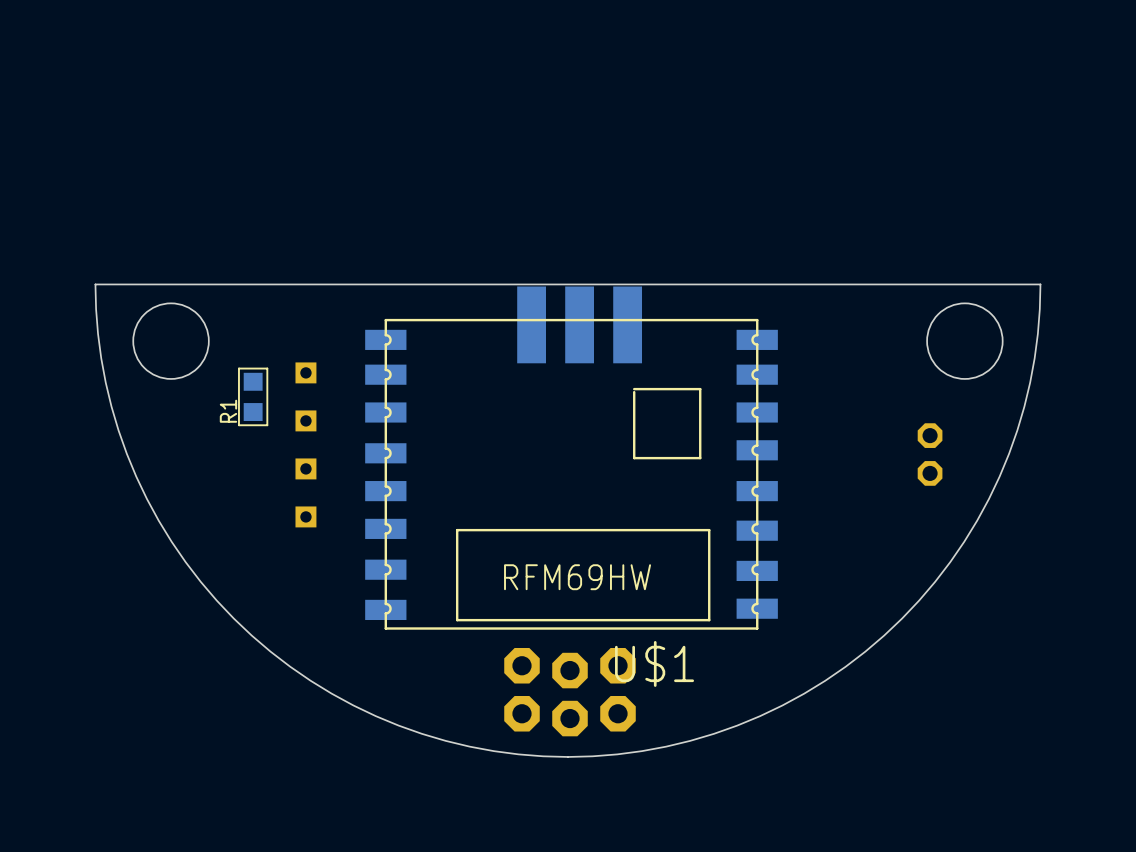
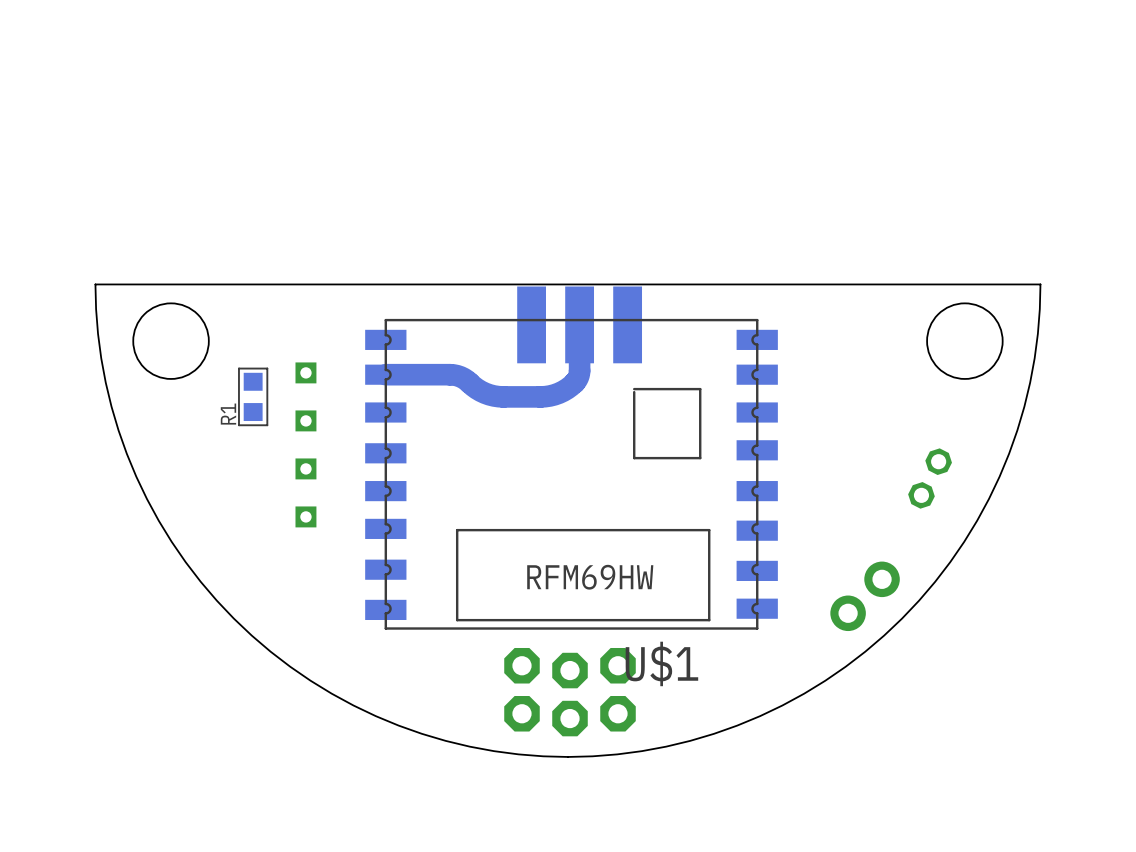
track: none -> (579, 324) (578, 377) (567, 388) (554, 394) (540, 396) (498, 396) (480, 391) (463, 378) (453, 374) (385, 374)
part: (930, 454) -> none
part: none -> (930, 478)
part: none -> (865, 596)

